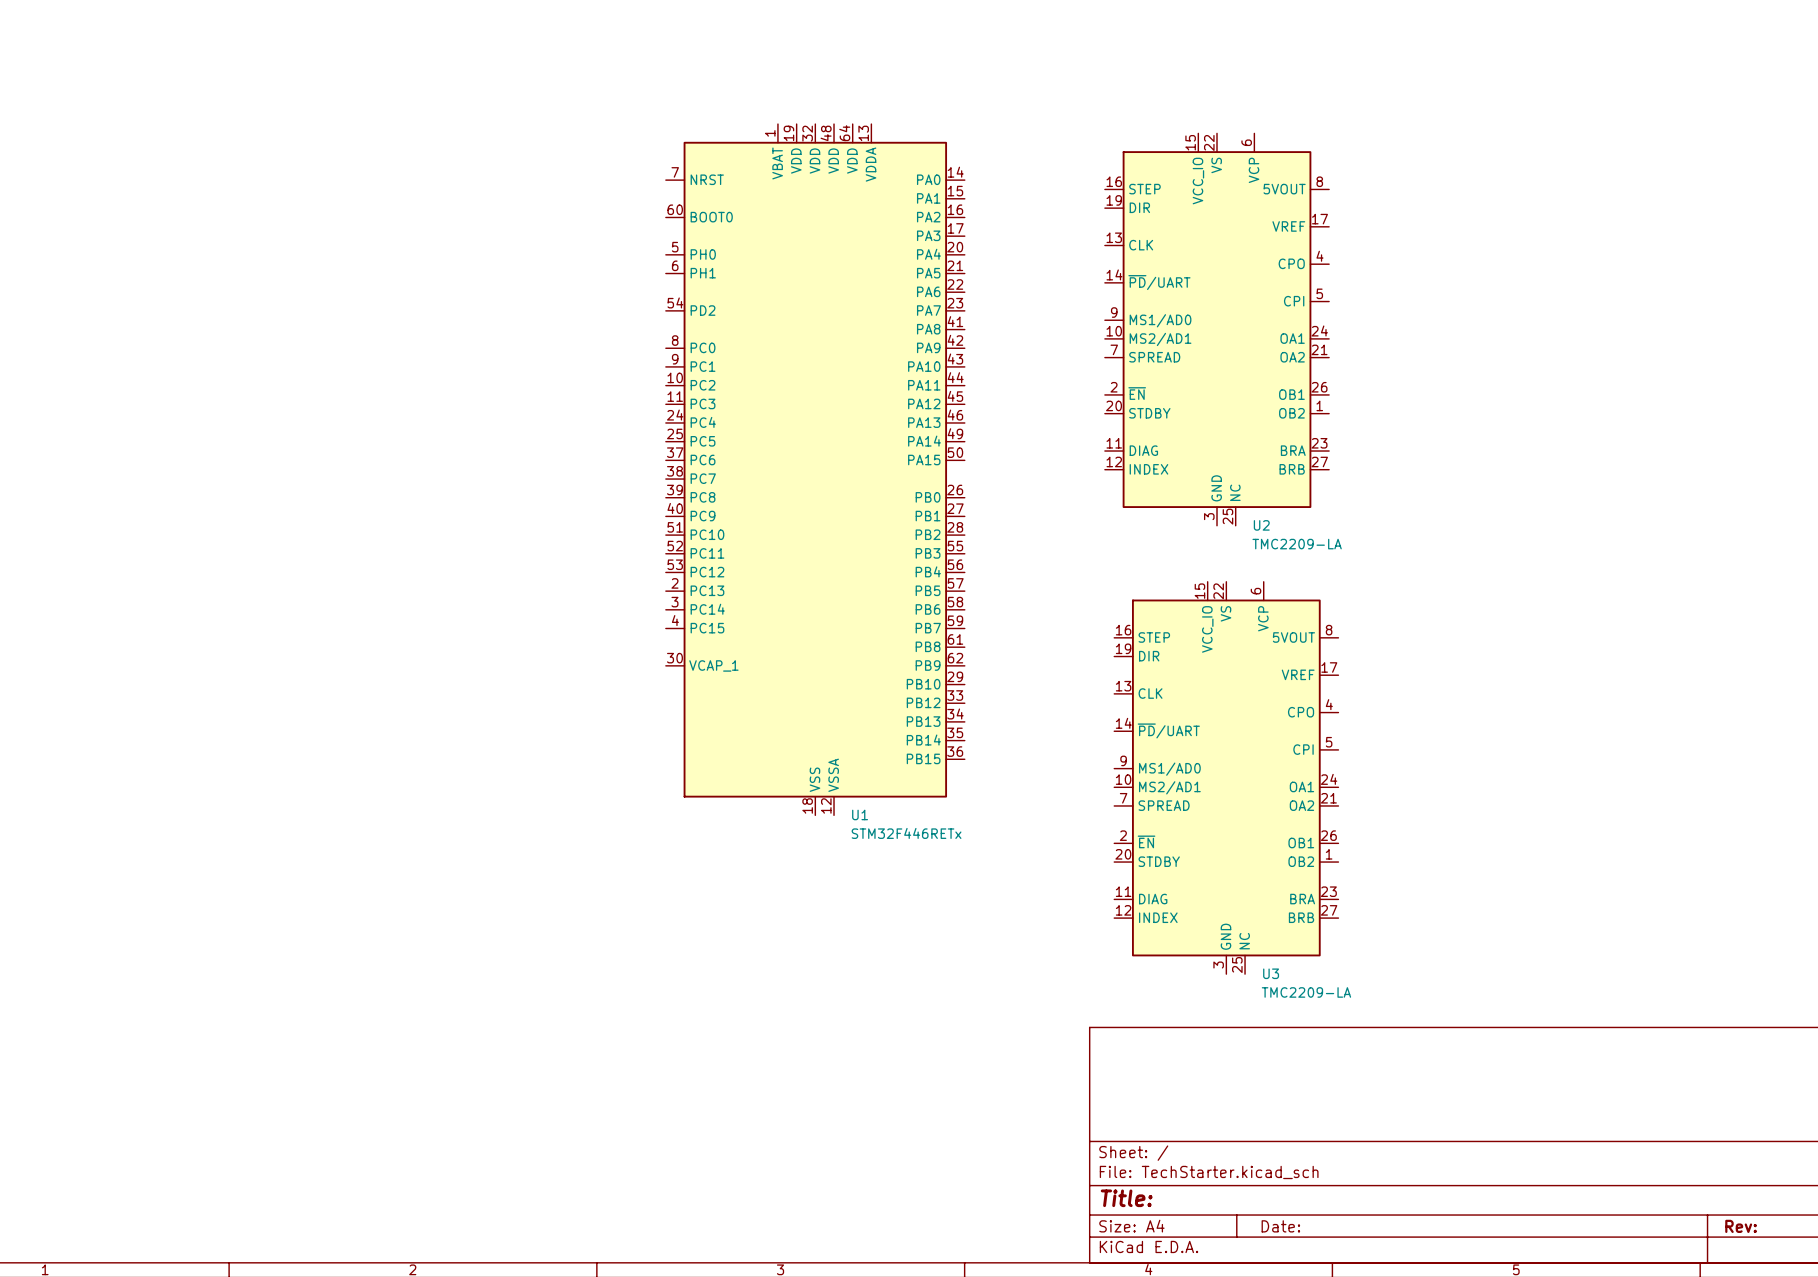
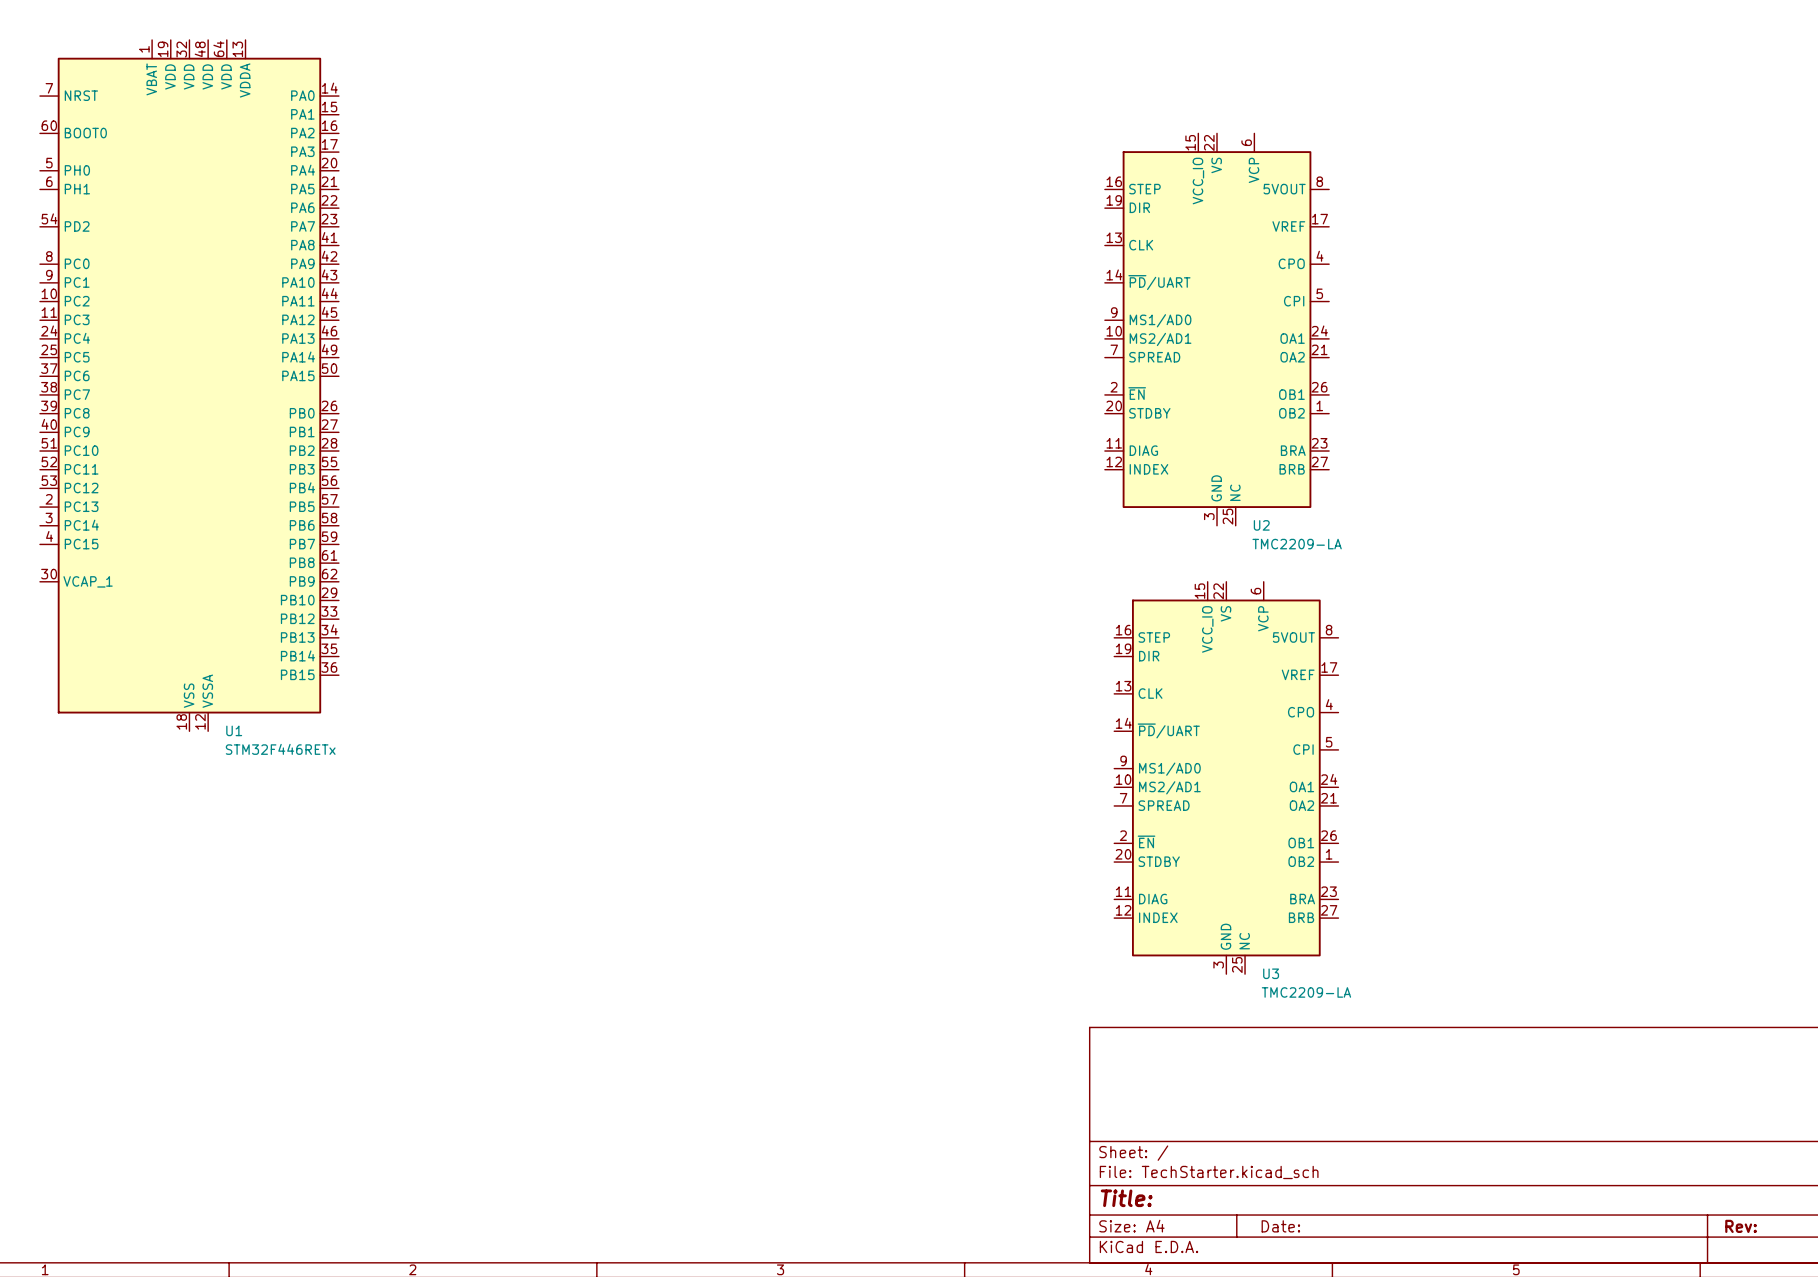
U1 position: (815, 469) -> (189, 385)

